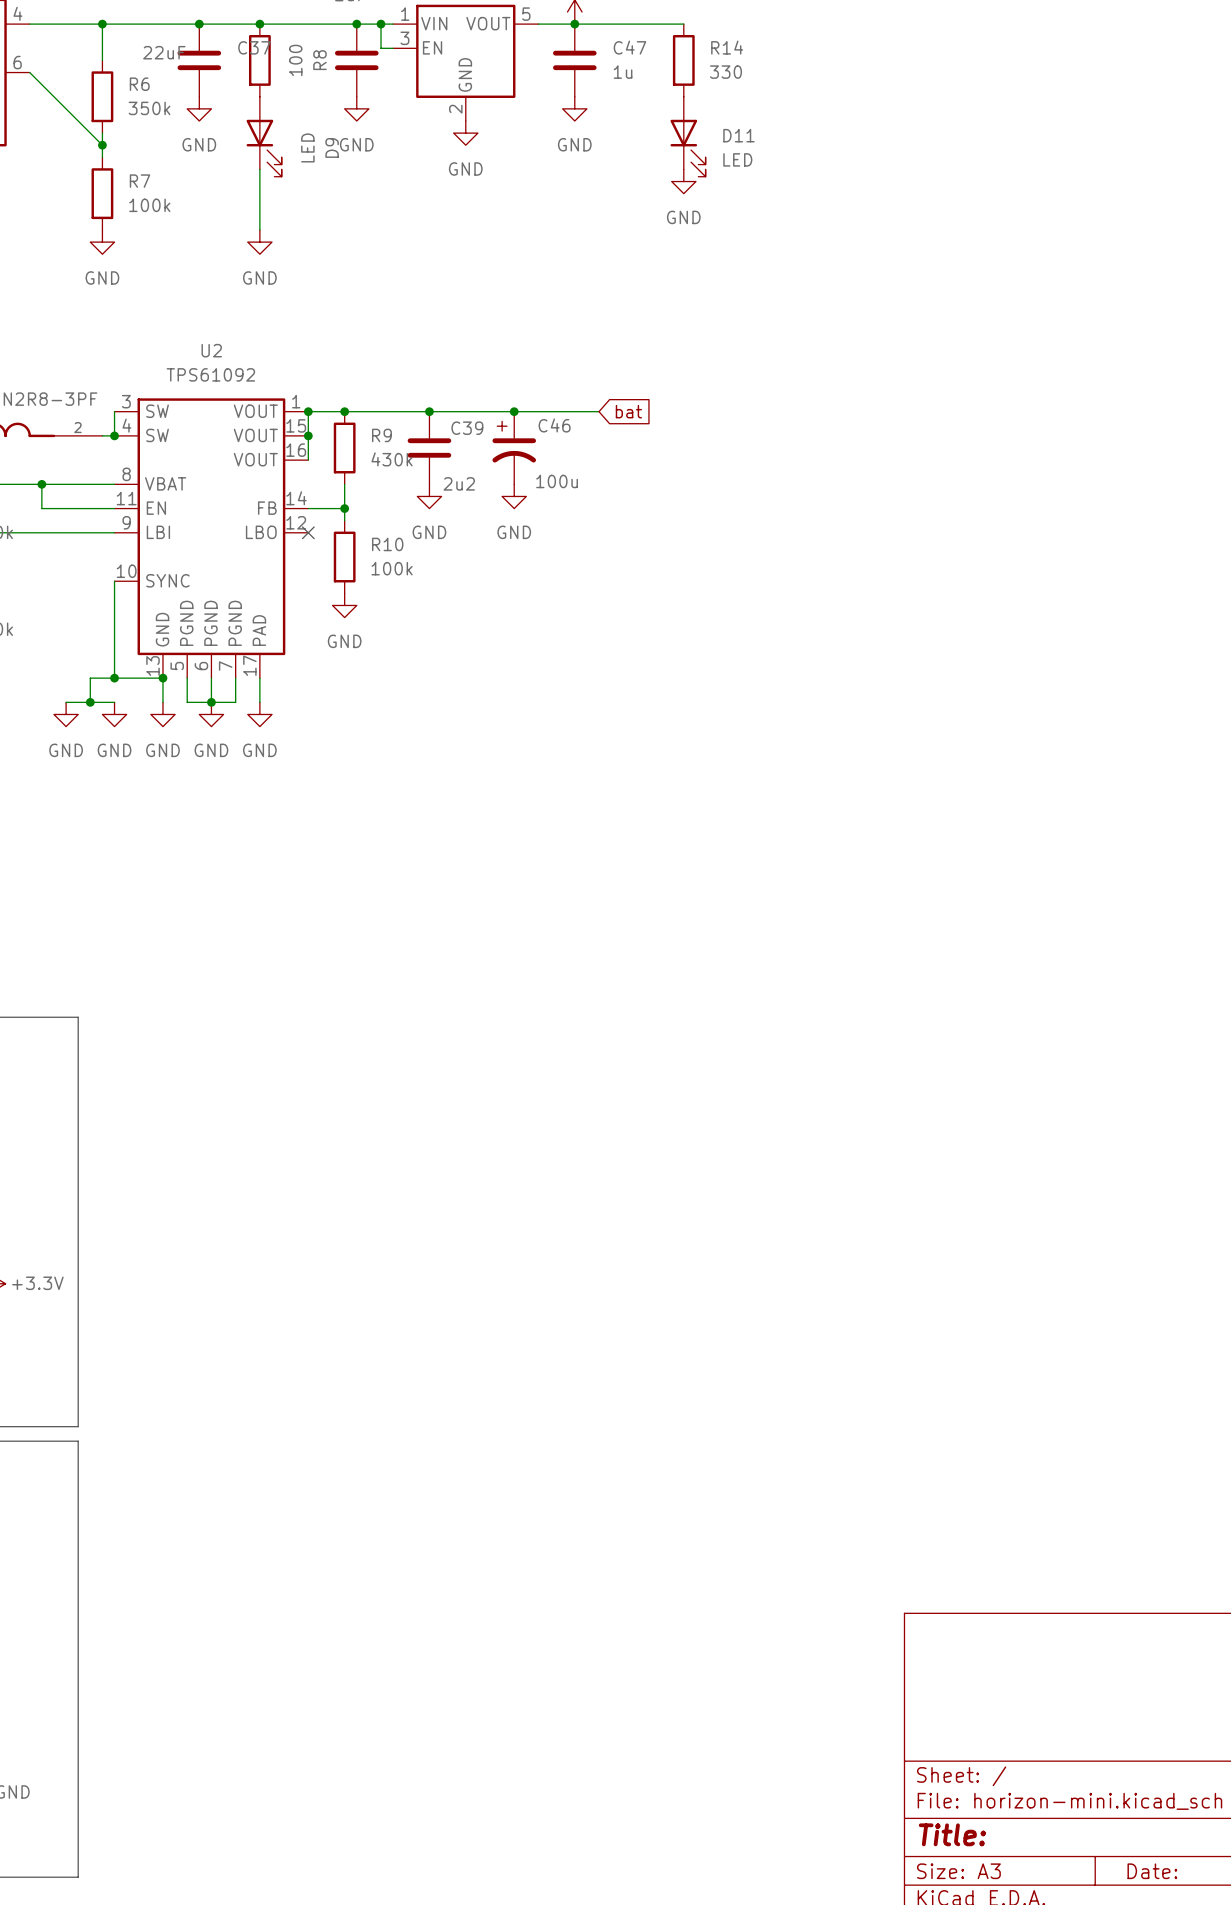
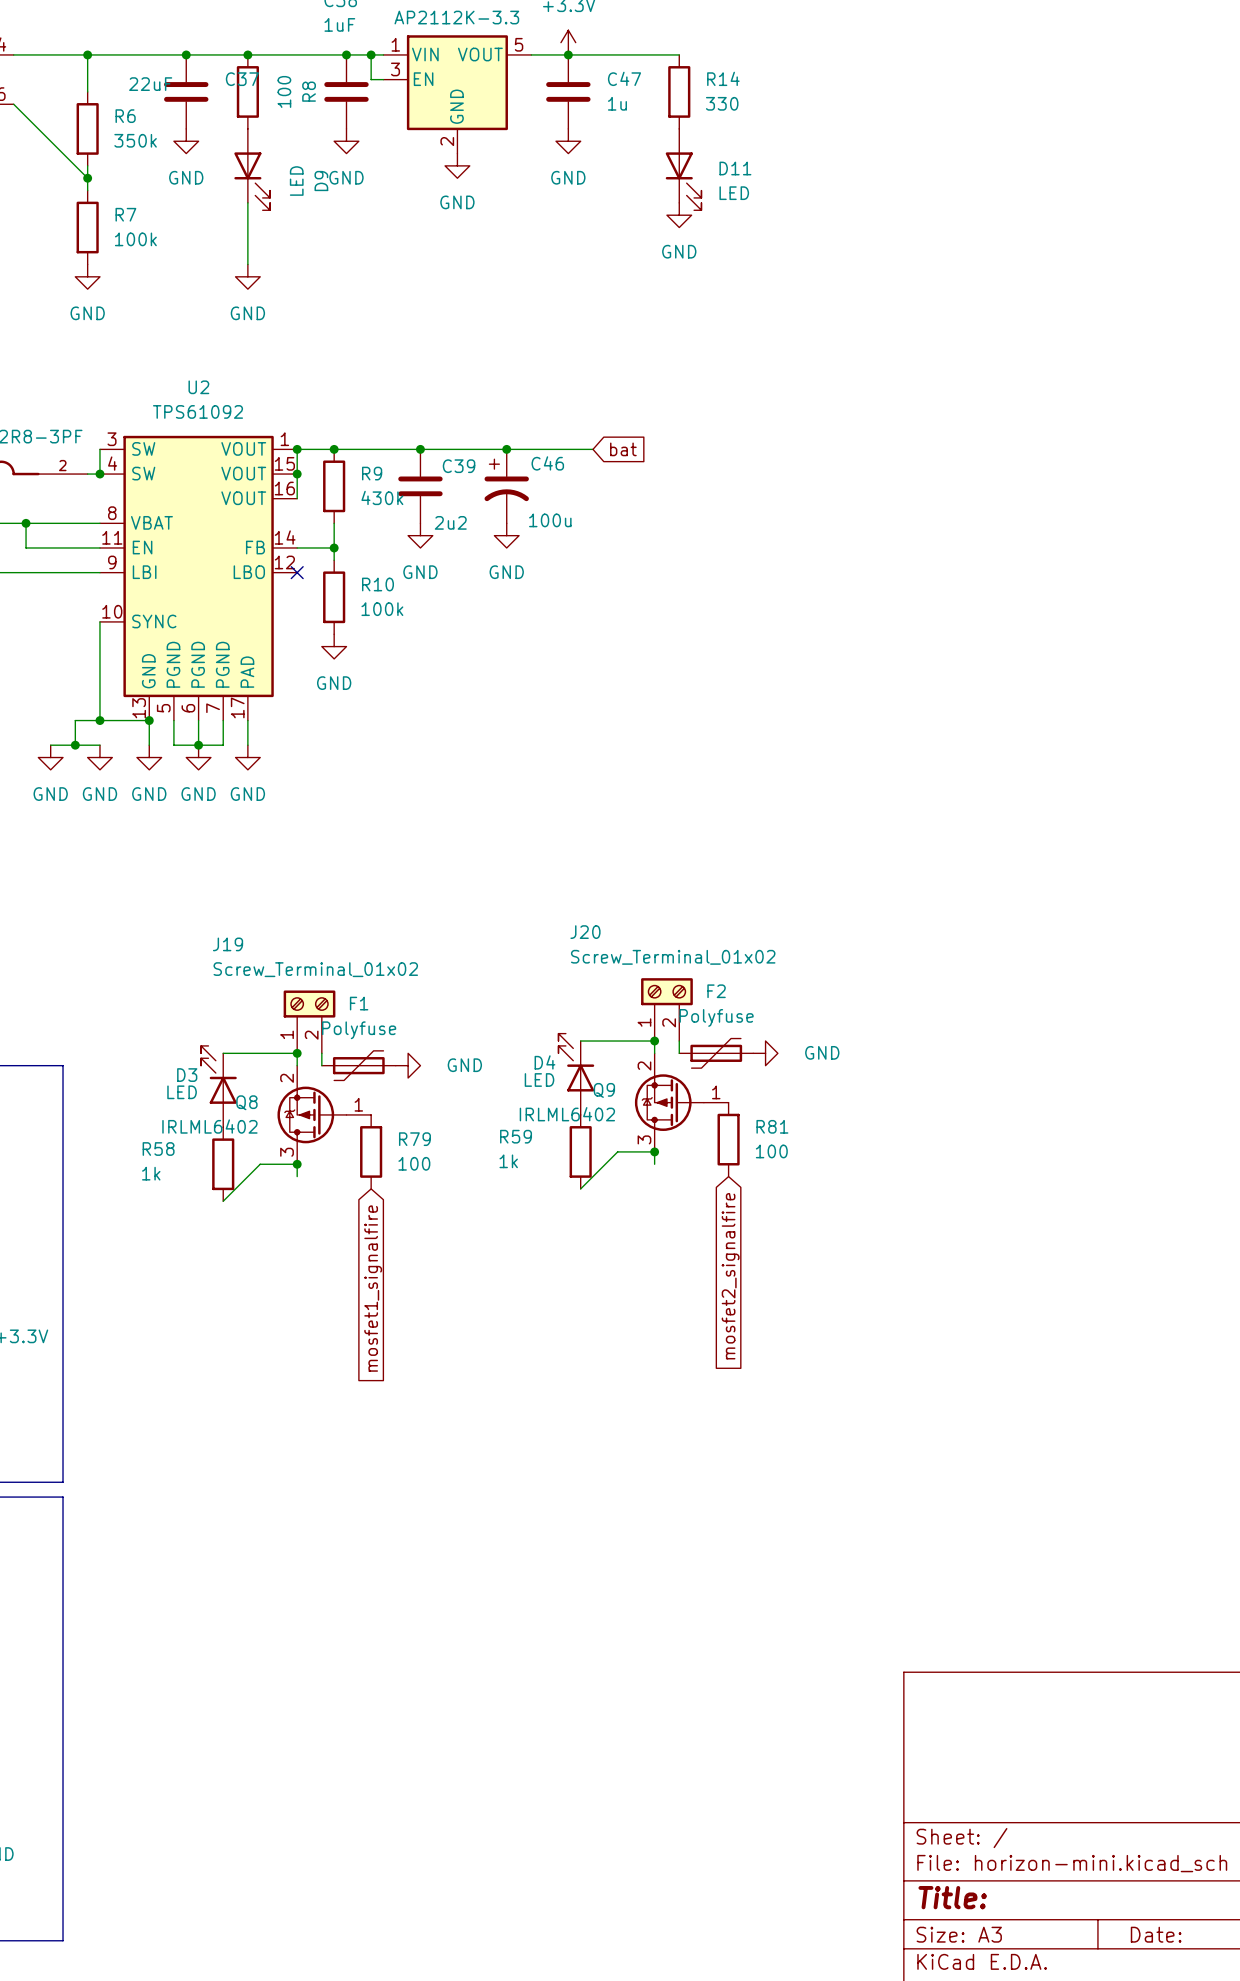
J20: none -> Screw_Terminal_01x02 (666, 1009)
J19: none -> Screw_Terminal_01x02 (309, 1021)
wire: none -> (580, 1041) (654, 1041) (654, 1053)
junction: none -> (654, 1041)
wire: none -> (679, 1041) (679, 1053)
wire: none -> (223, 1053) (297, 1053) (297, 1065)
junction: none -> (297, 1053)
wire: none -> (321, 1053) (321, 1065)
F2: none -> Polyfuse (716, 1053)
power symbol: none -> GND (765, 1053)
F1: none -> Polyfuse (358, 1065)
power symbol: none -> GND (408, 1065)
D4: none -> LED (576, 1074)
D3: none -> LED (218, 1086)
Q9: none -> IRLML6402 (681, 1102)
Q8: none -> IRLML6402 (324, 1114)
R81: none -> 100 (728, 1139)
R79: none -> 100 (371, 1151)
R59: none -> 1k (580, 1151)
junction: none -> (654, 1151)
R58: none -> 1k (223, 1164)
junction: none -> (297, 1164)
wire: none -> (654, 1164) (654, 1151) (617, 1151) (580, 1188)
wire: none -> (297, 1176) (297, 1164) (260, 1164) (223, 1201)
global label: none -> mosfet2_signalfire (730, 1276)
global label: none -> mosfet1_signalfire (373, 1288)

